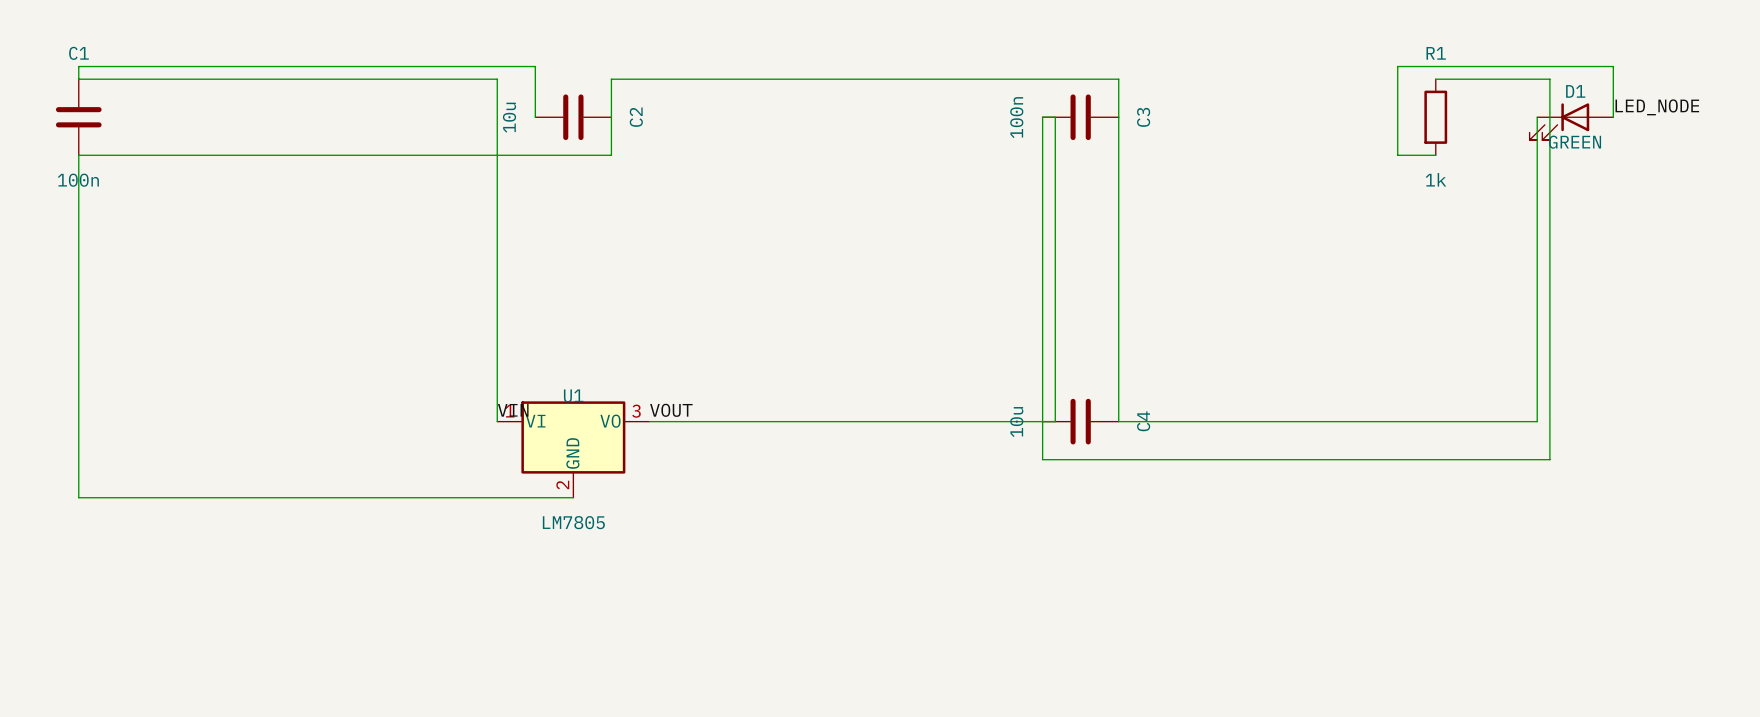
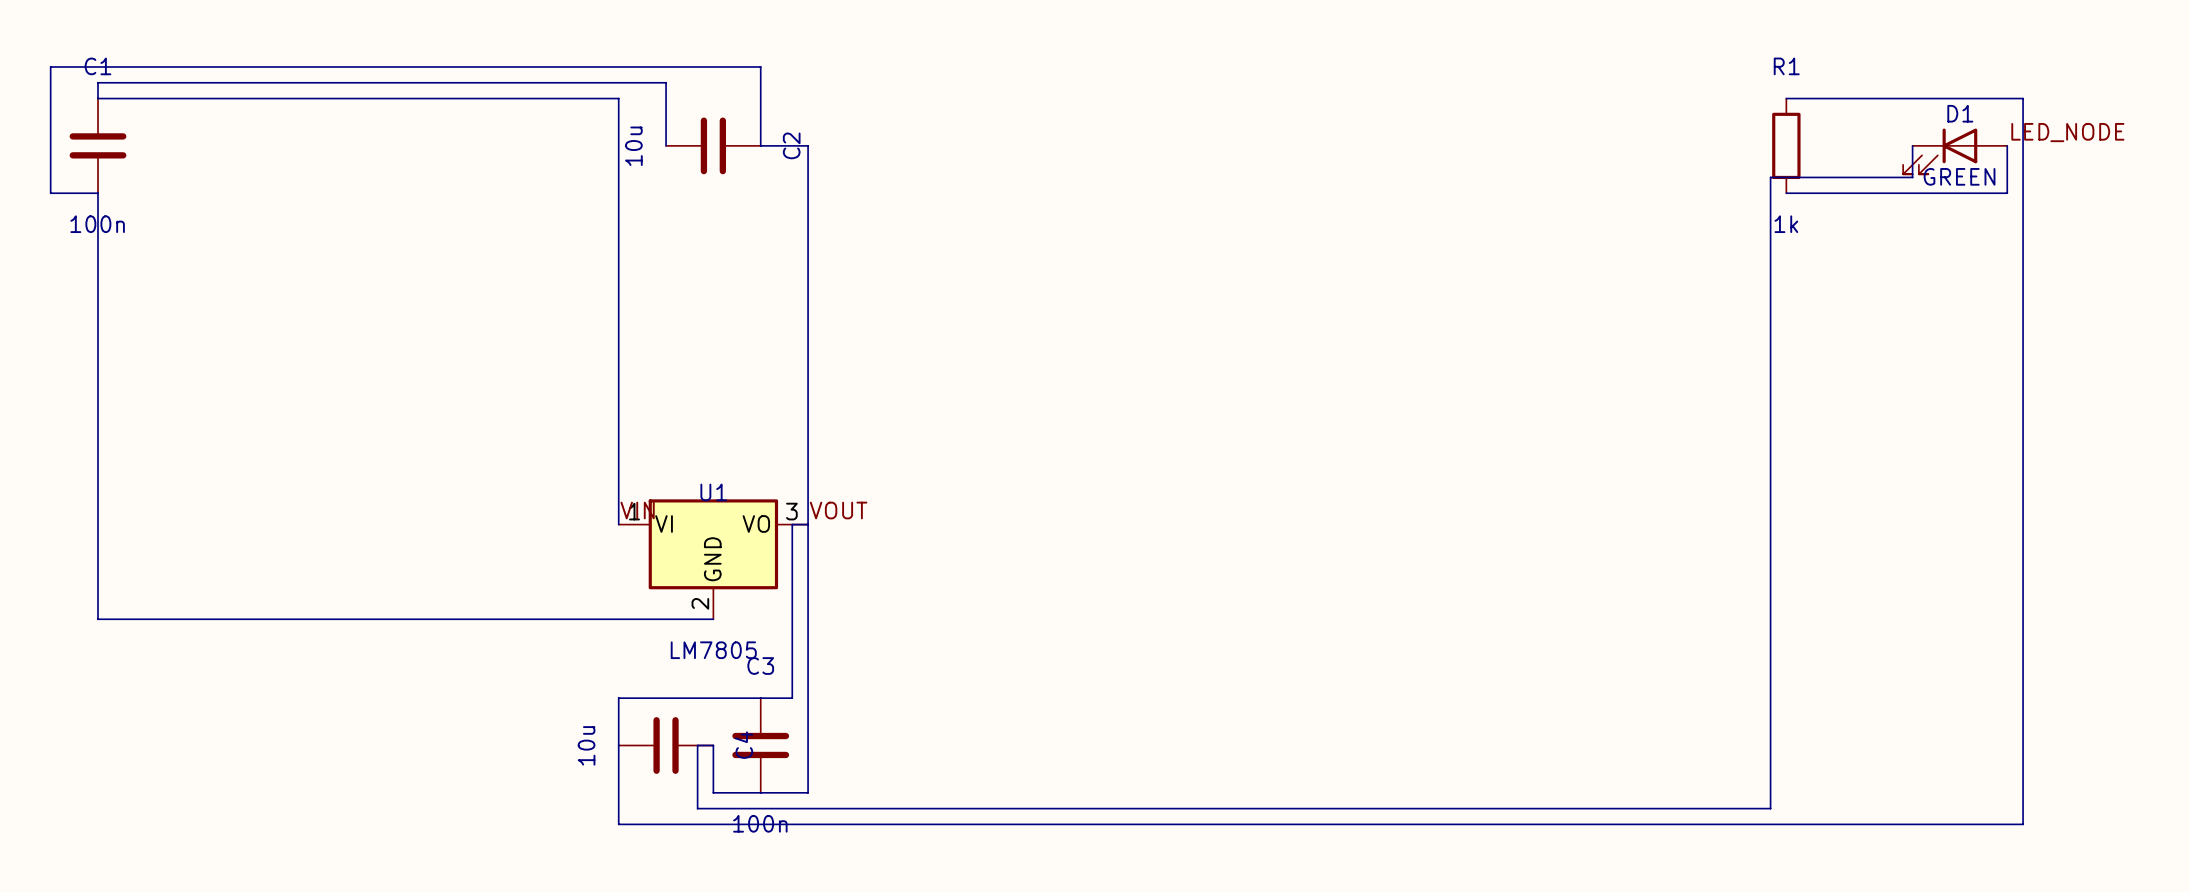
wire: (611, 79) (1118, 79) (1118, 421) (1537, 421) (1537, 142) -> (760, 145) (808, 145) (808, 792) (713, 792) (713, 745) (697, 745) (697, 808) (1770, 808) (1770, 177) (1912, 177)
wire: (1549, 79) (1549, 459) (1042, 459) (1042, 117) (1055, 117) (1055, 421) (649, 421) -> (1928, 98) (2023, 98) (2023, 824) (618, 824) (618, 698) (792, 698) (792, 524) (808, 524)
wire: (611, 117) (611, 155) (78, 155) -> (760, 98) (760, 66) (50, 66) (50, 193) (98, 193)
C3 value position: 100n (1016, 117) -> 100n (760, 823)
C3 rotation: 0° (1080, 117) -> 90° clockwise (760, 745)
C3 position: (1080, 117) -> (760, 745)
C3 name position: C3 (1143, 117) -> C3 (760, 666)
wire: (1613, 117) (1613, 66) (1397, 66) (1397, 155) (1435, 155) -> (2007, 145) (2007, 193) (1786, 193)
C4 position: (1080, 421) -> (666, 745)

